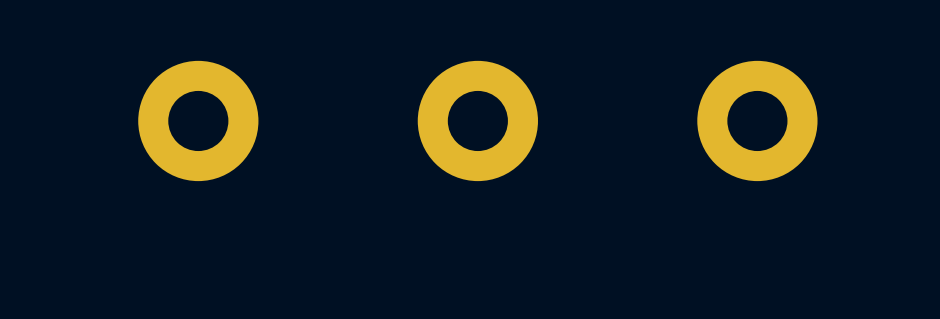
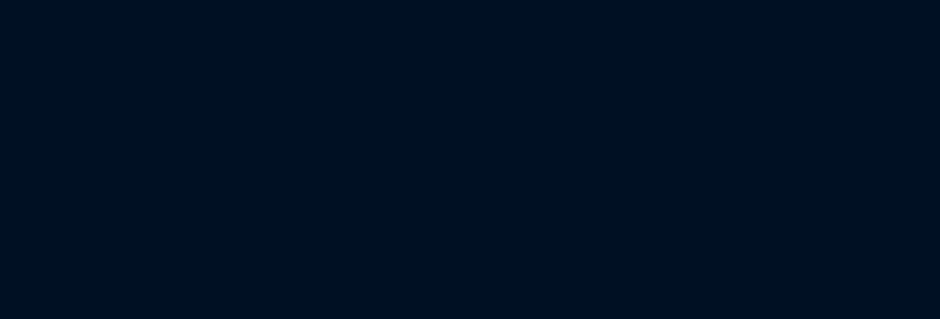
part: (198, 120) -> none
part: (477, 120) -> none
part: (757, 120) -> none

